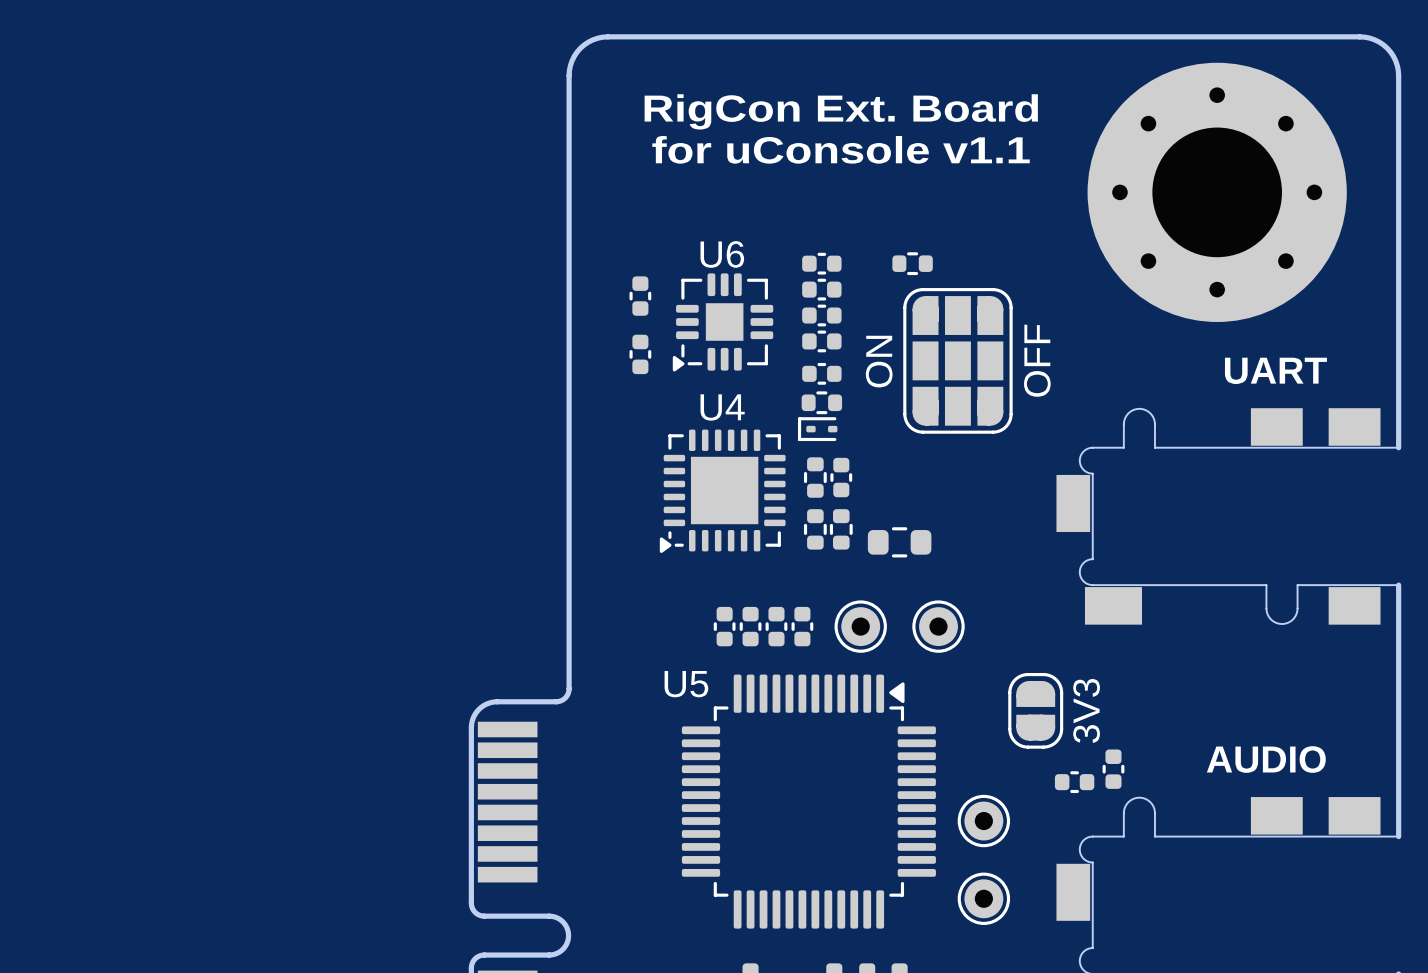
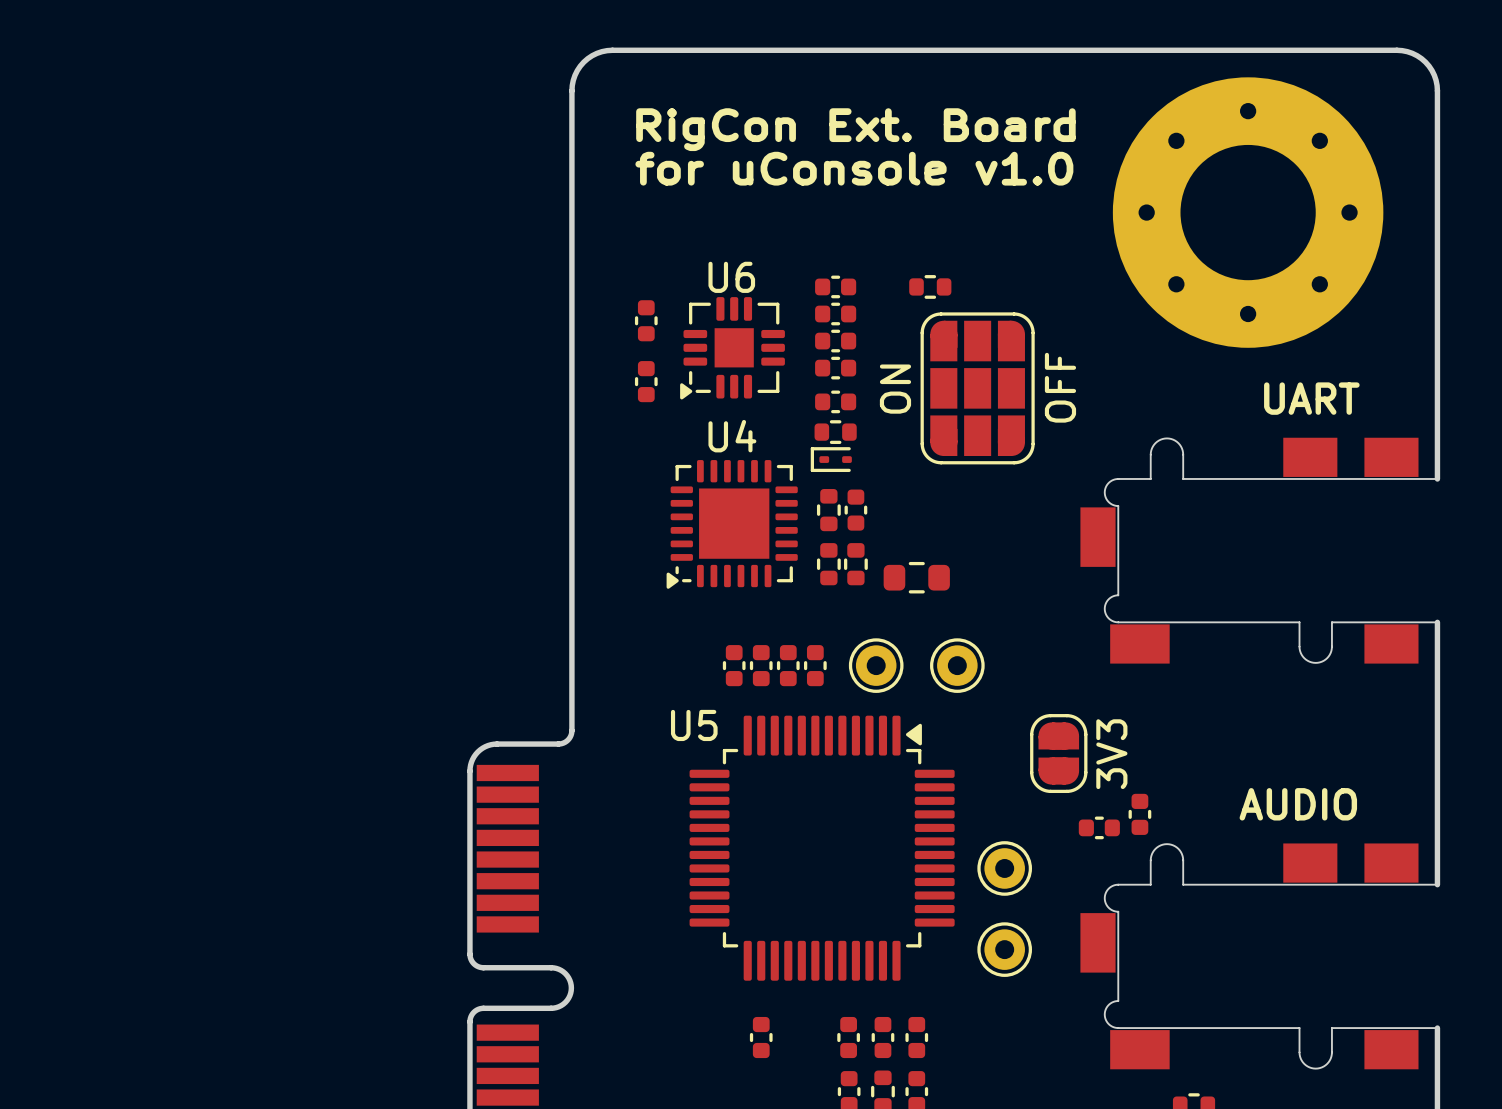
text: for uConsole v1.1 (841, 149) -> for uConsole v1.0 (854, 168)

